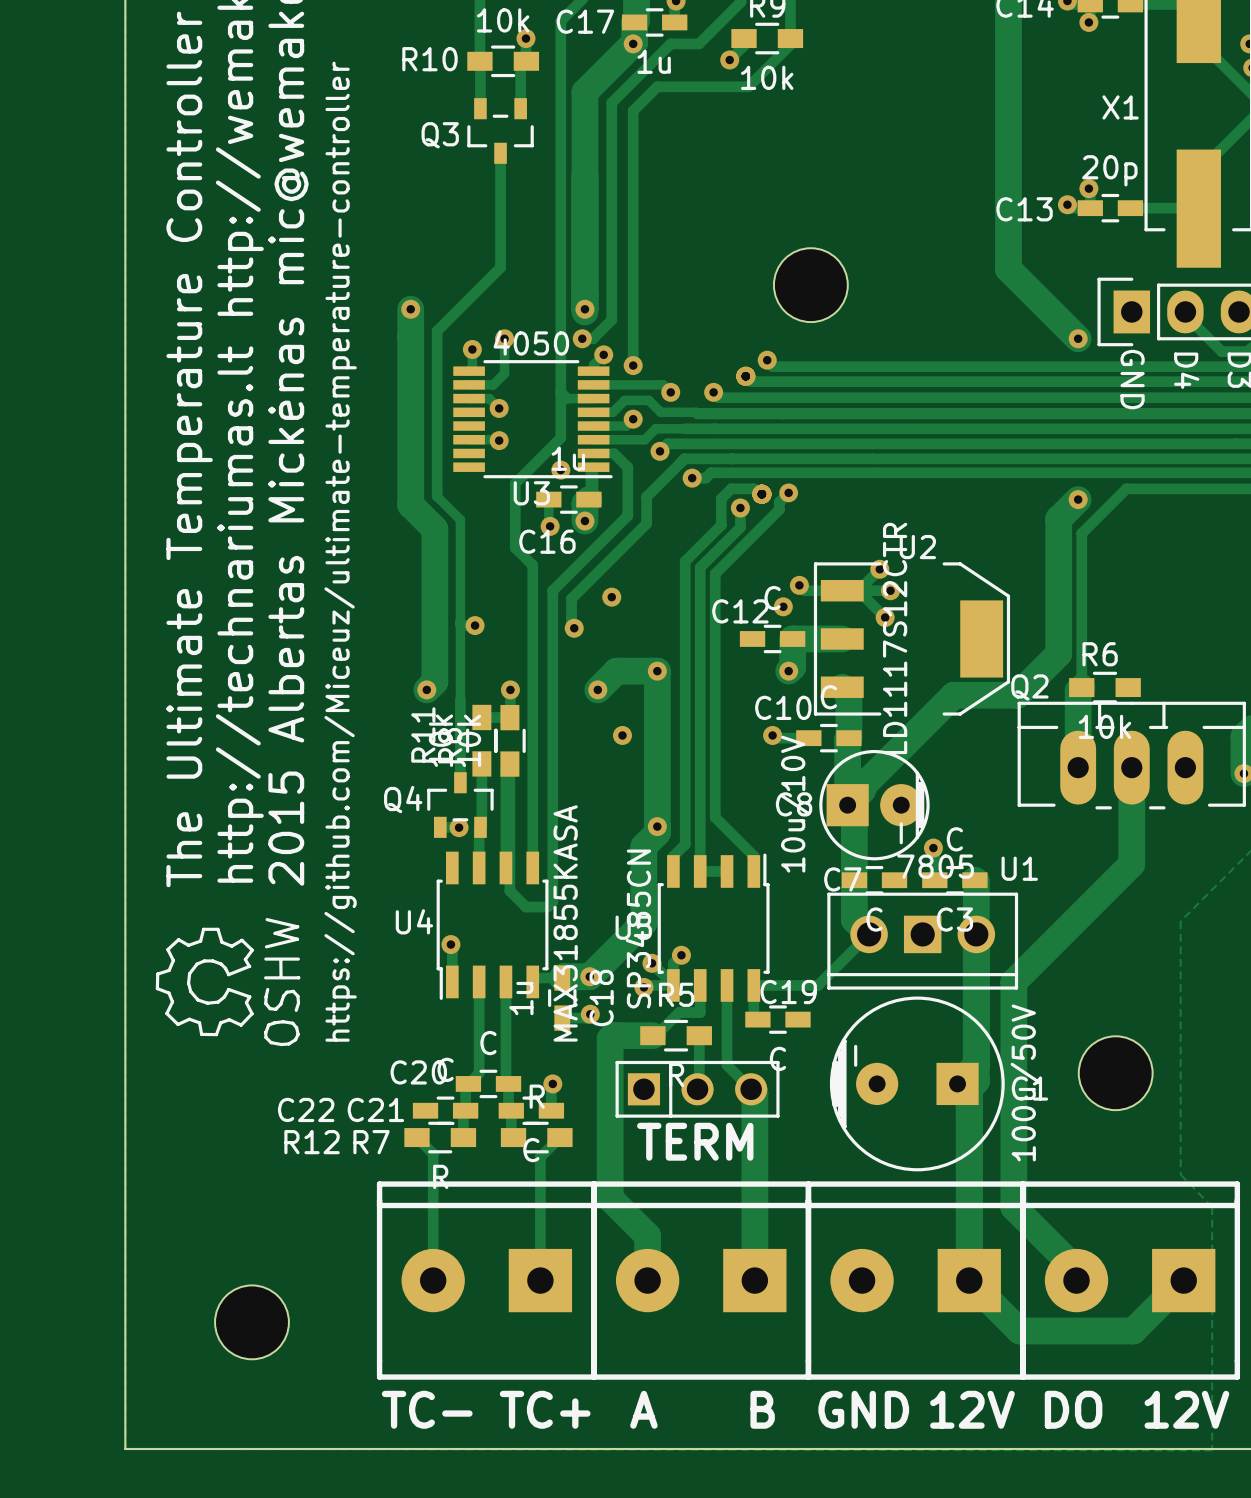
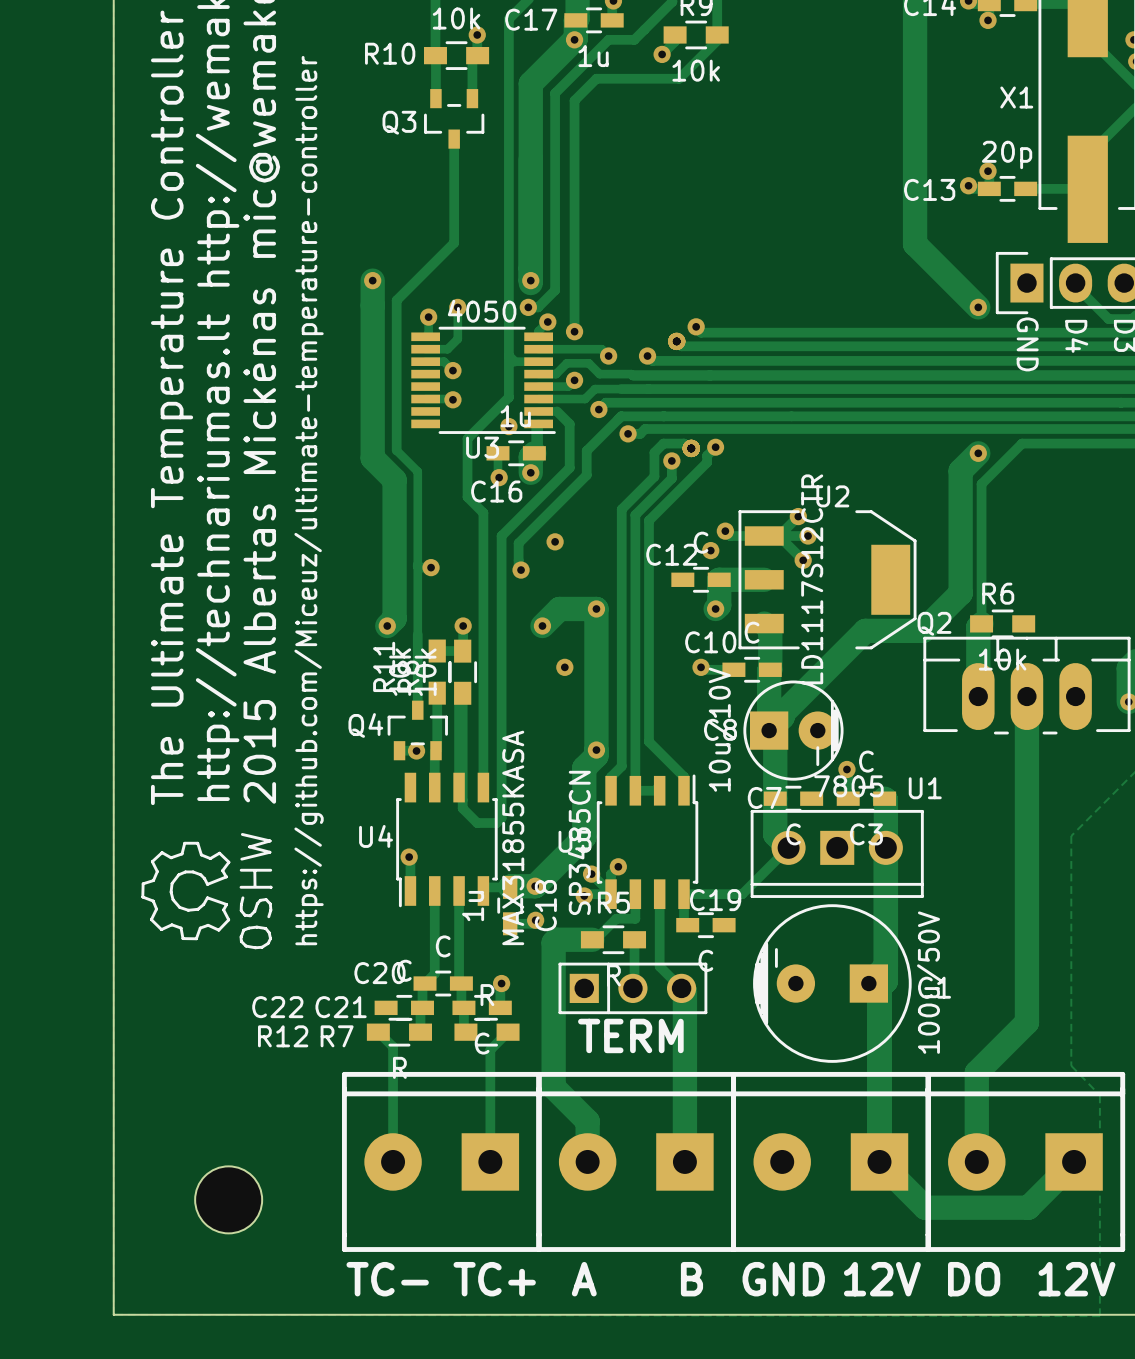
part: (810, 285) -> none
track: (1131, 864) (1013, 982) (1013, 1207) (1076, 1269) -> (1026, 784) (1026, 1022) (976, 1072) (976, 1152)
part: (1115, 1073) -> none

